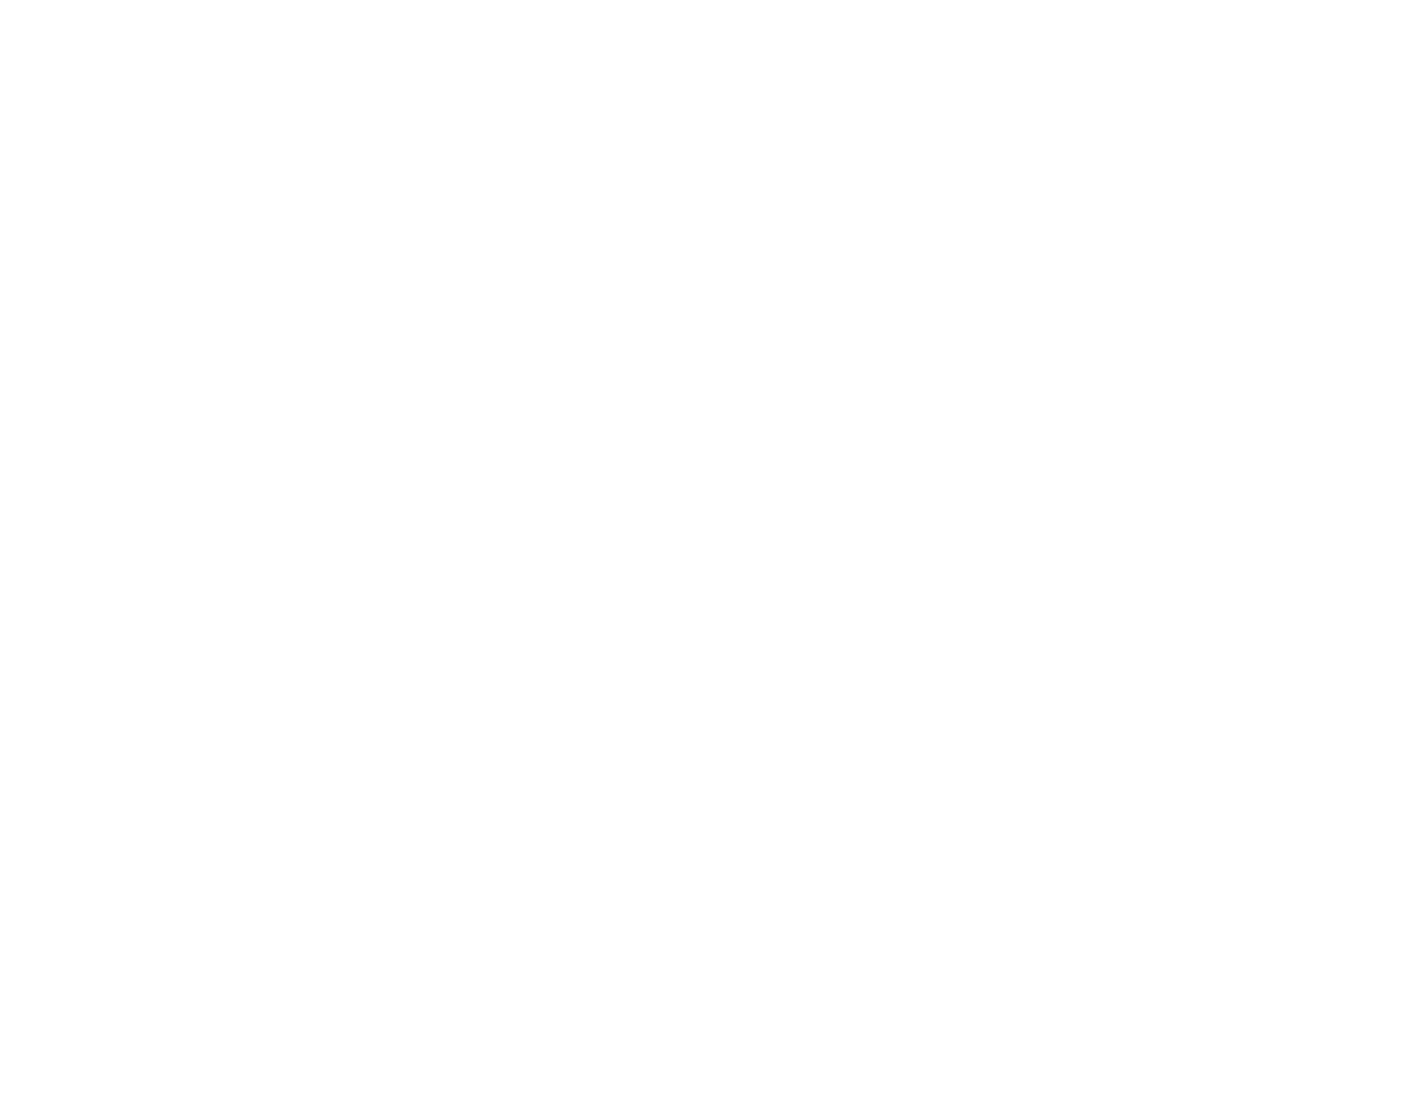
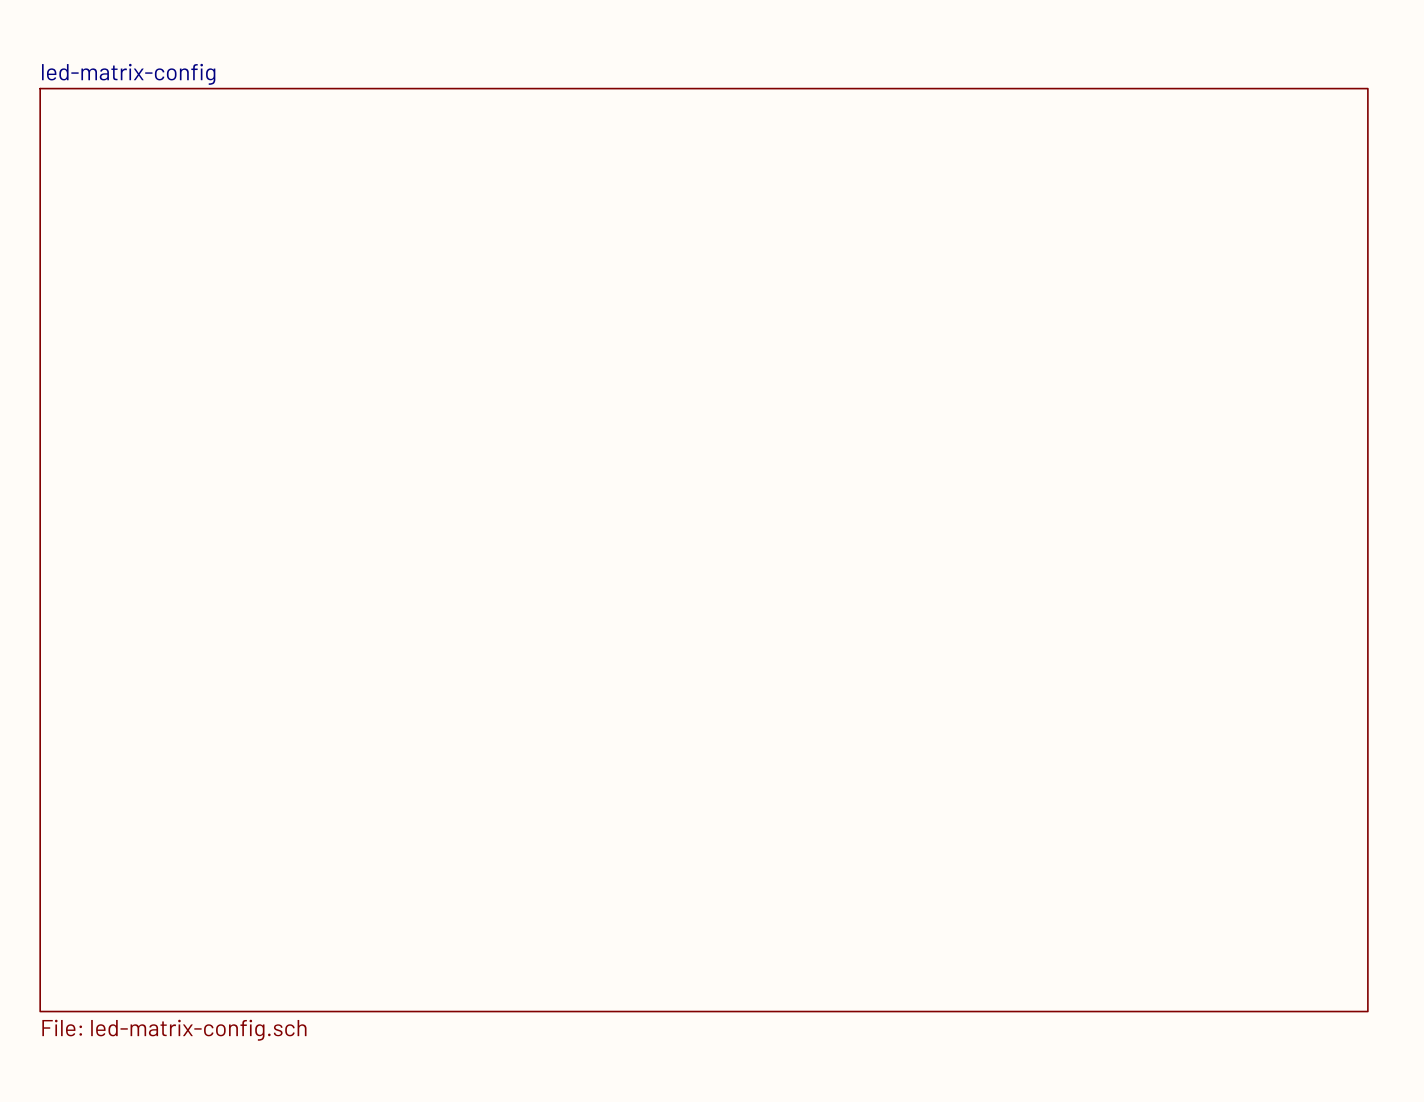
sheet led-matrix-config: none -> File: led-matrix-config.sch (704, 550)

